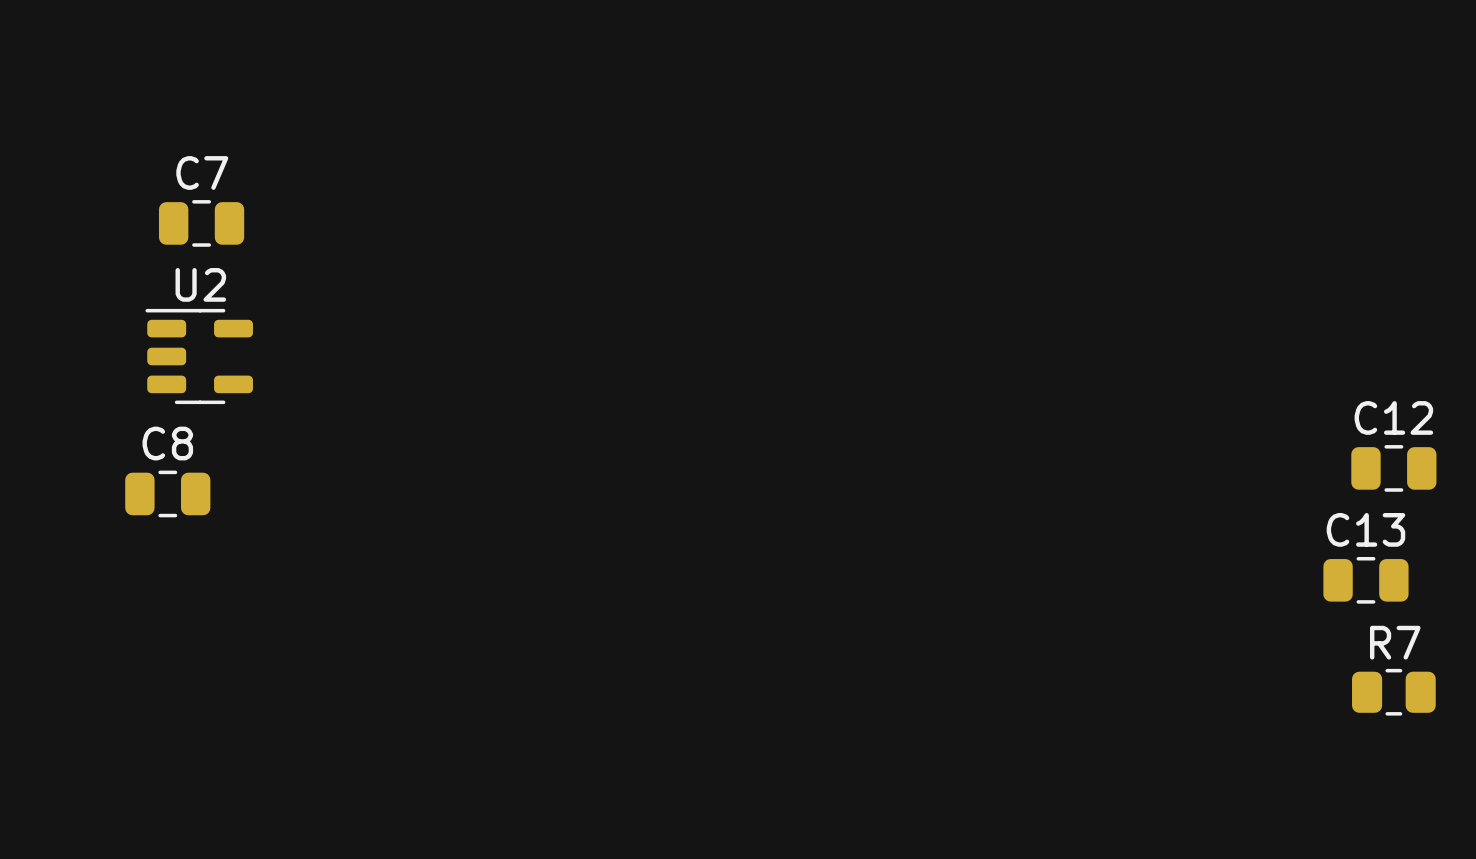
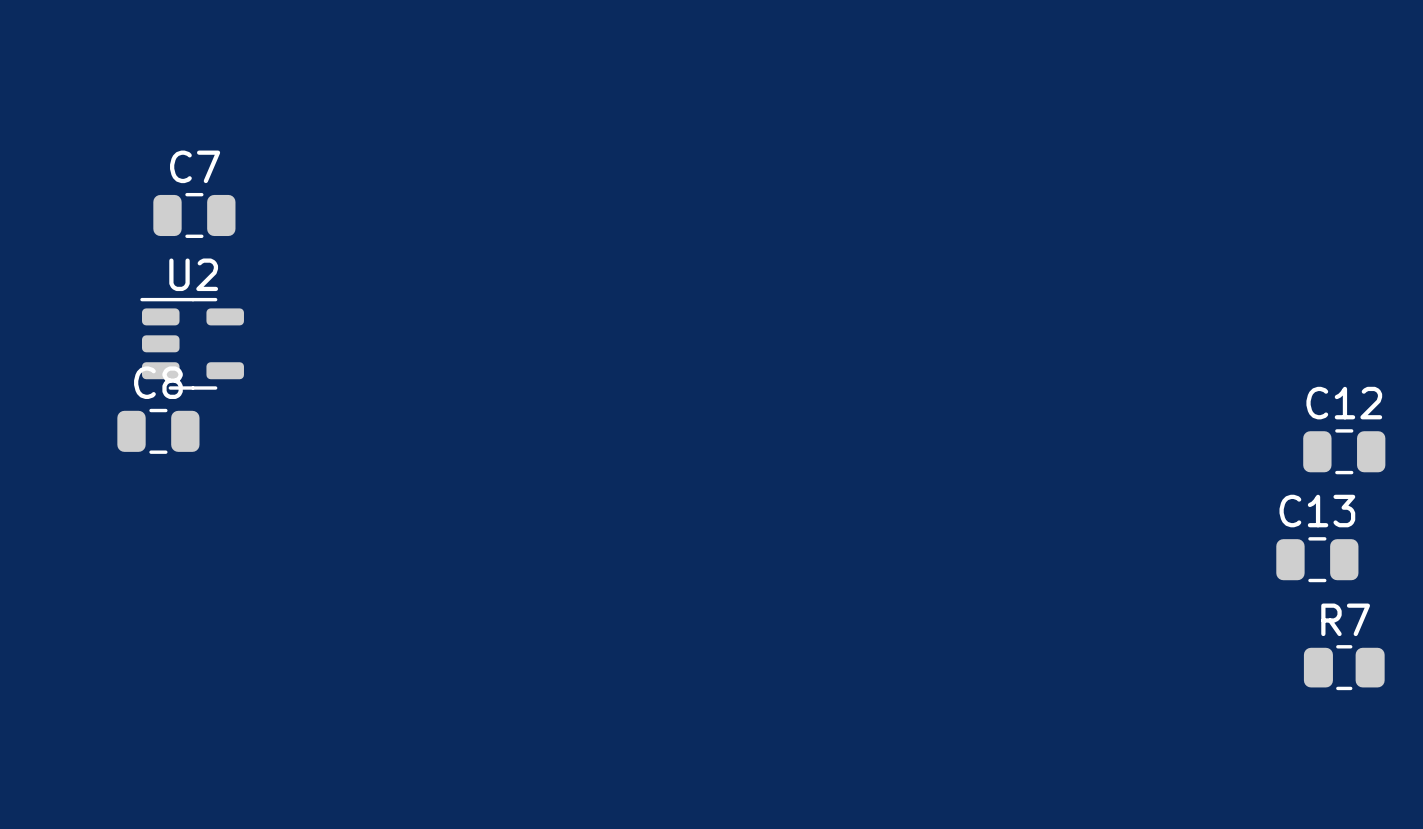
C8 position: (167, 493) -> (158, 431)

